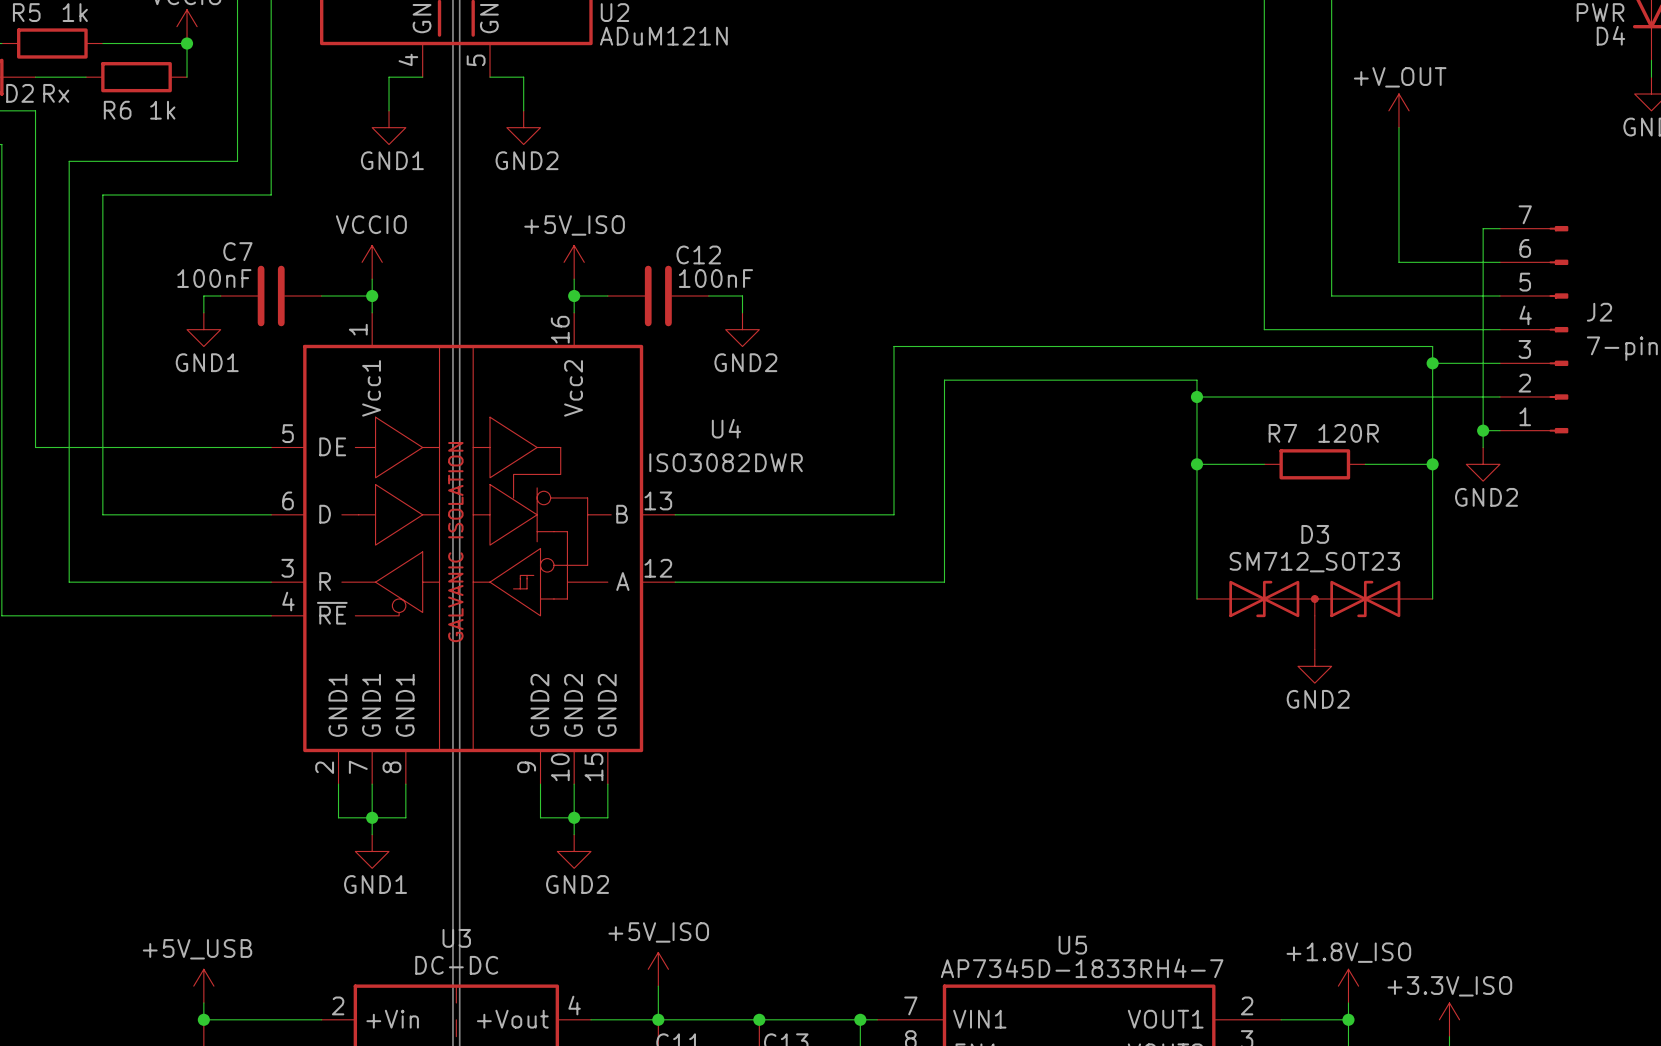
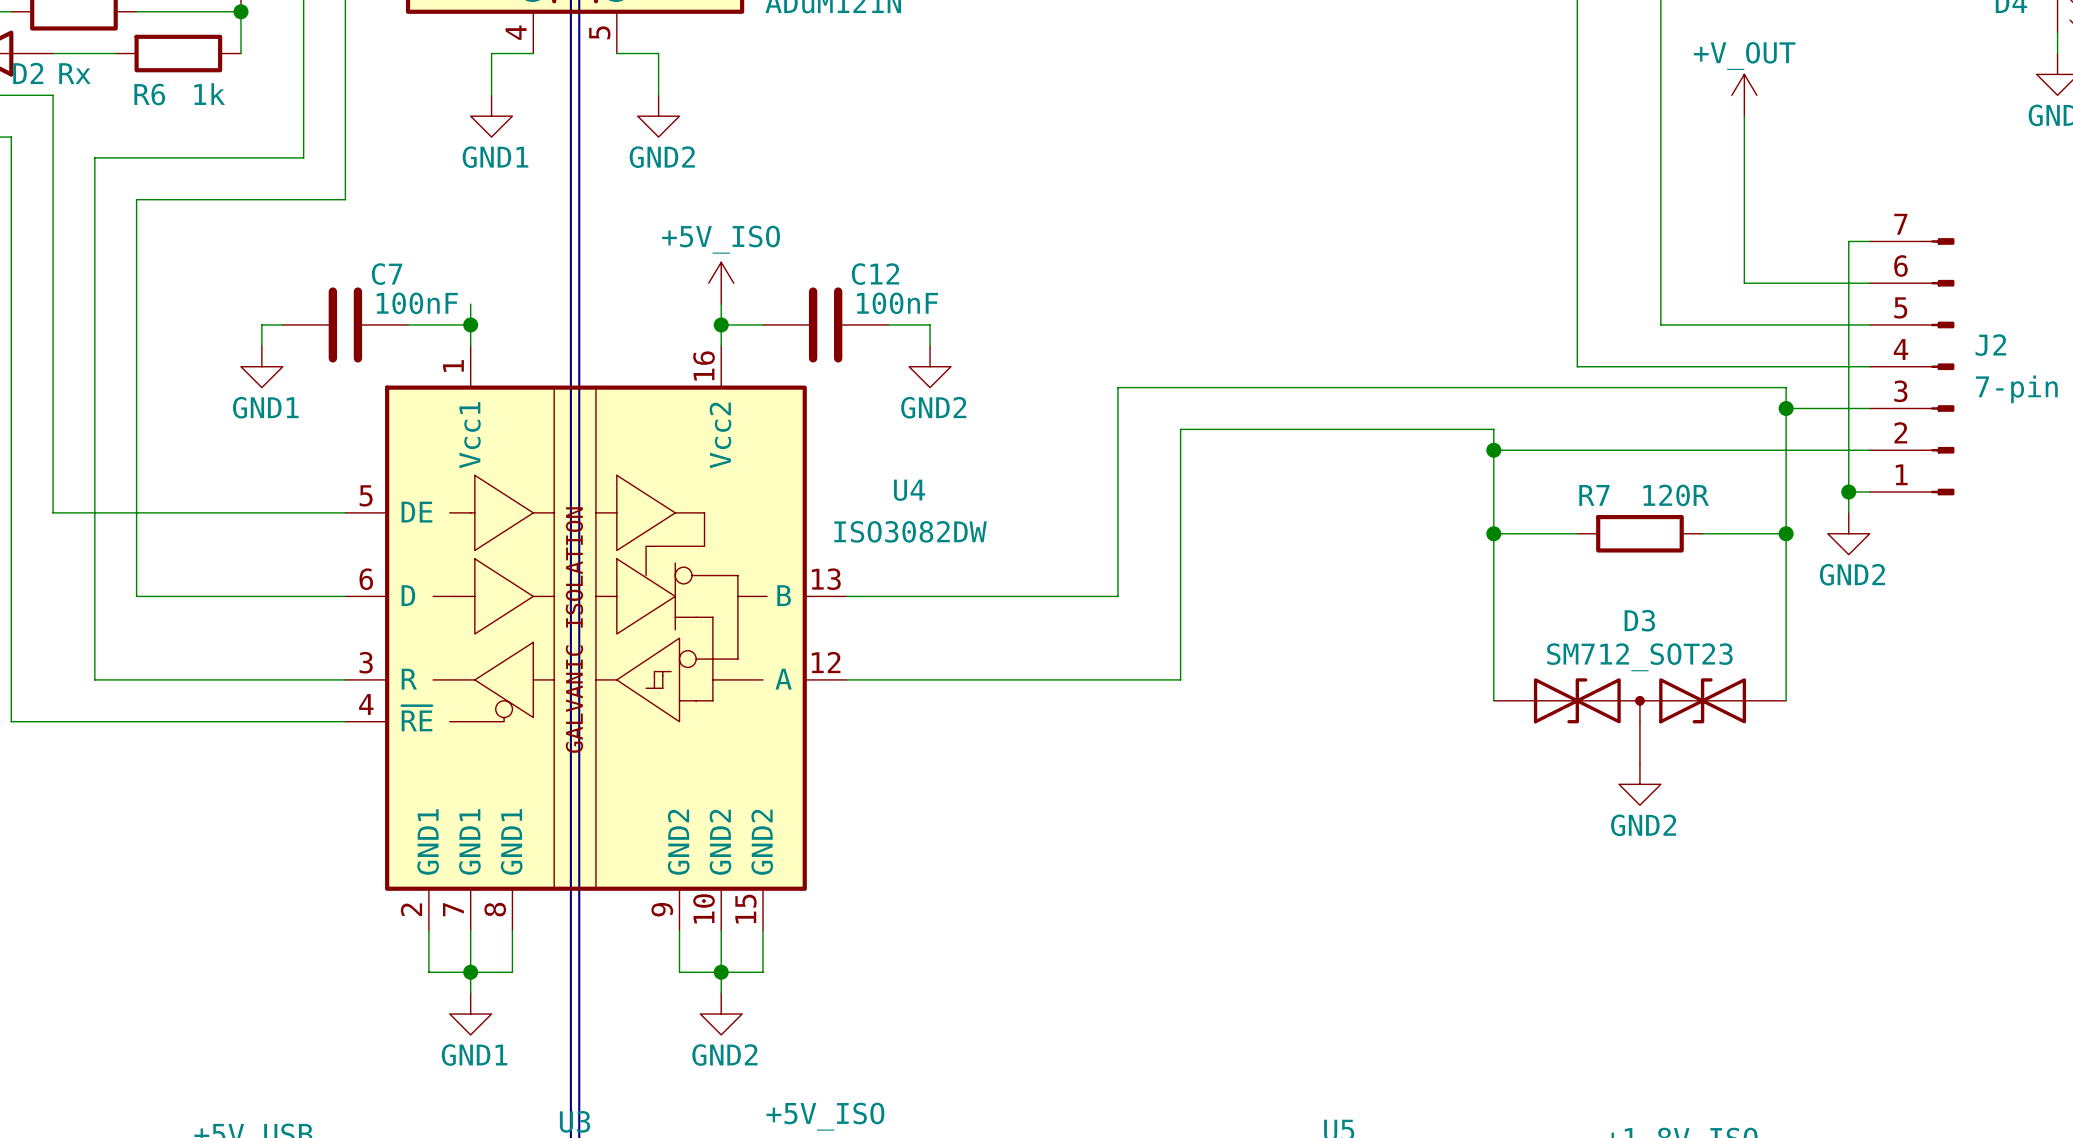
C7 name position: C7 (237, 251) -> C7 (387, 274)
power symbol: VCCIO (372, 262) -> none
C7 value position: 100nF (214, 278) -> 100nF (417, 303)
U4 value: ISO3082DWR (726, 462) -> ISO3082DW (910, 531)

